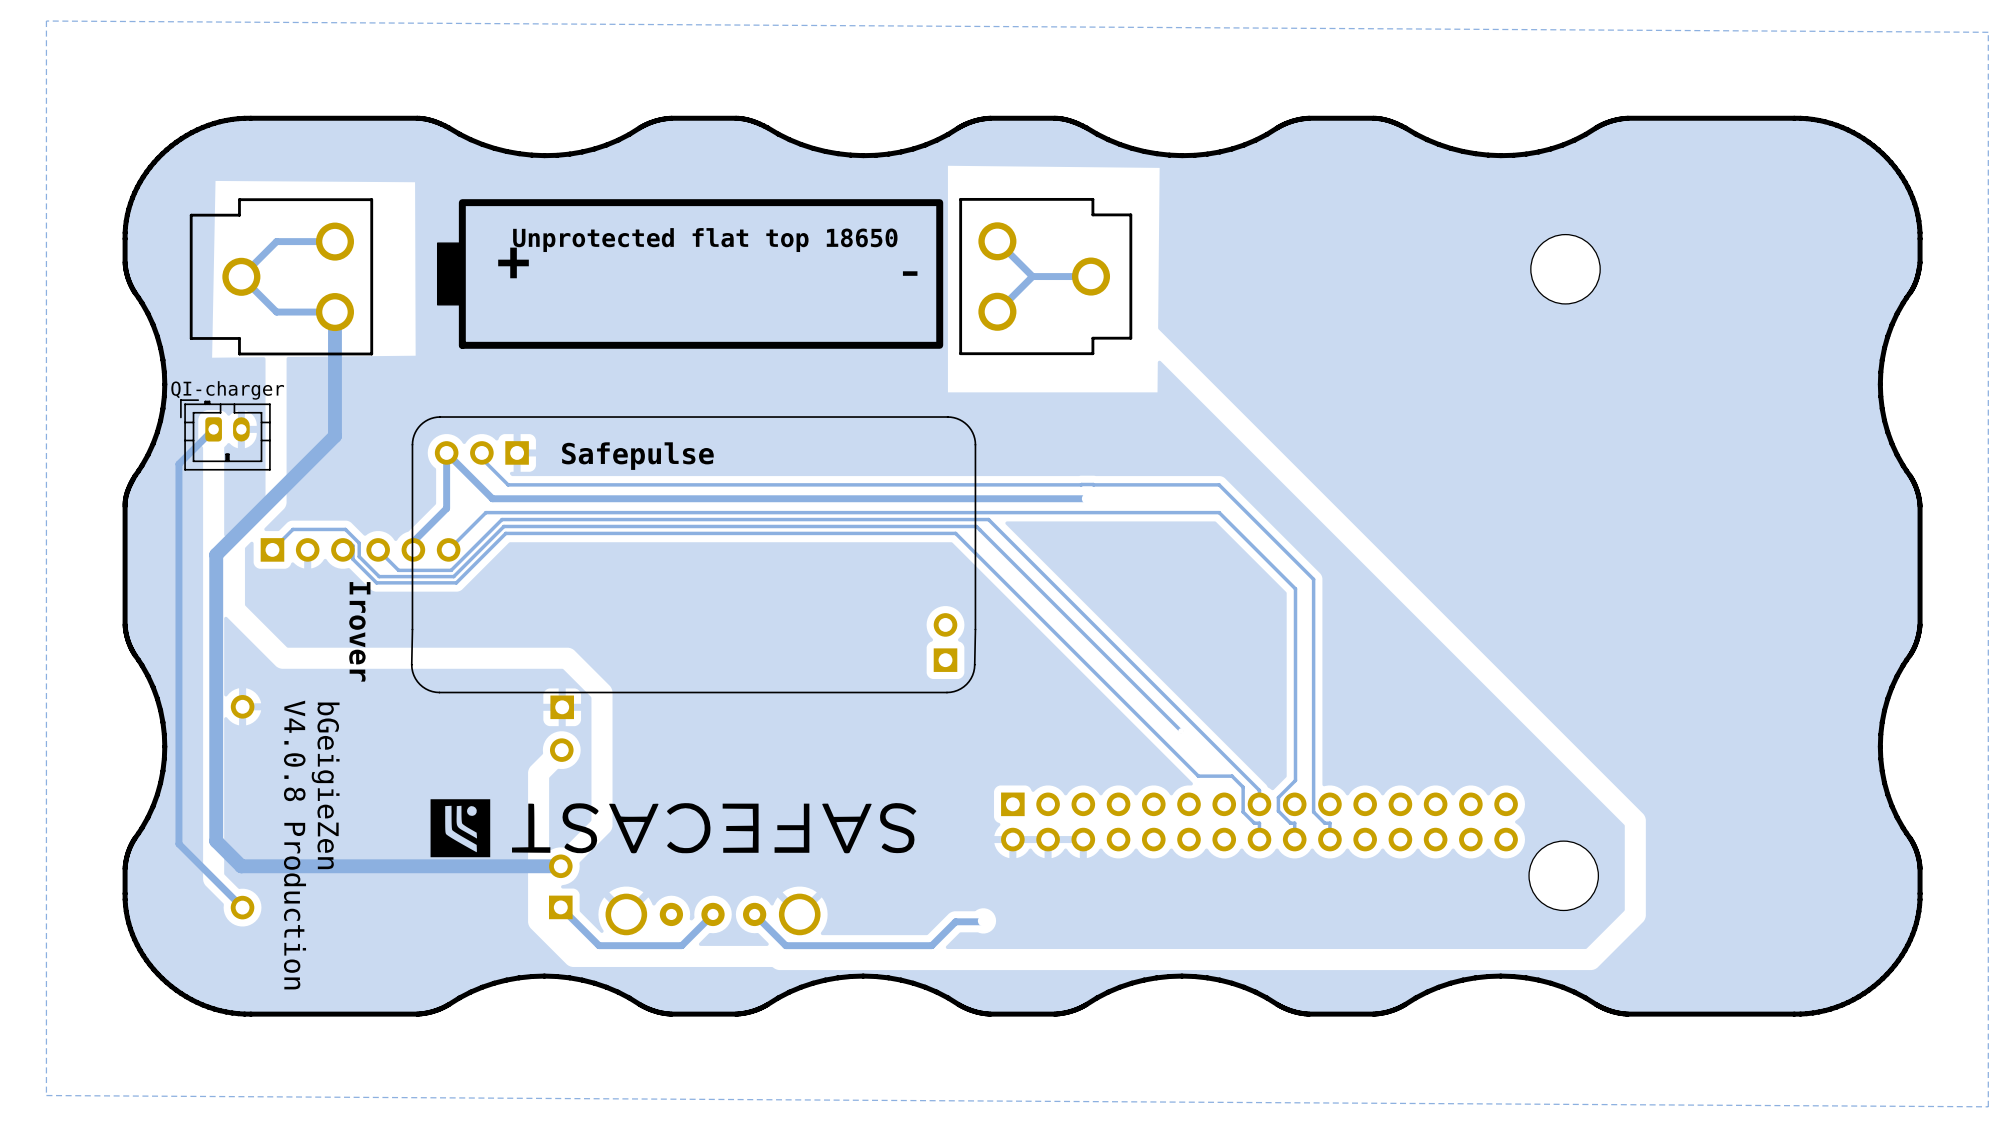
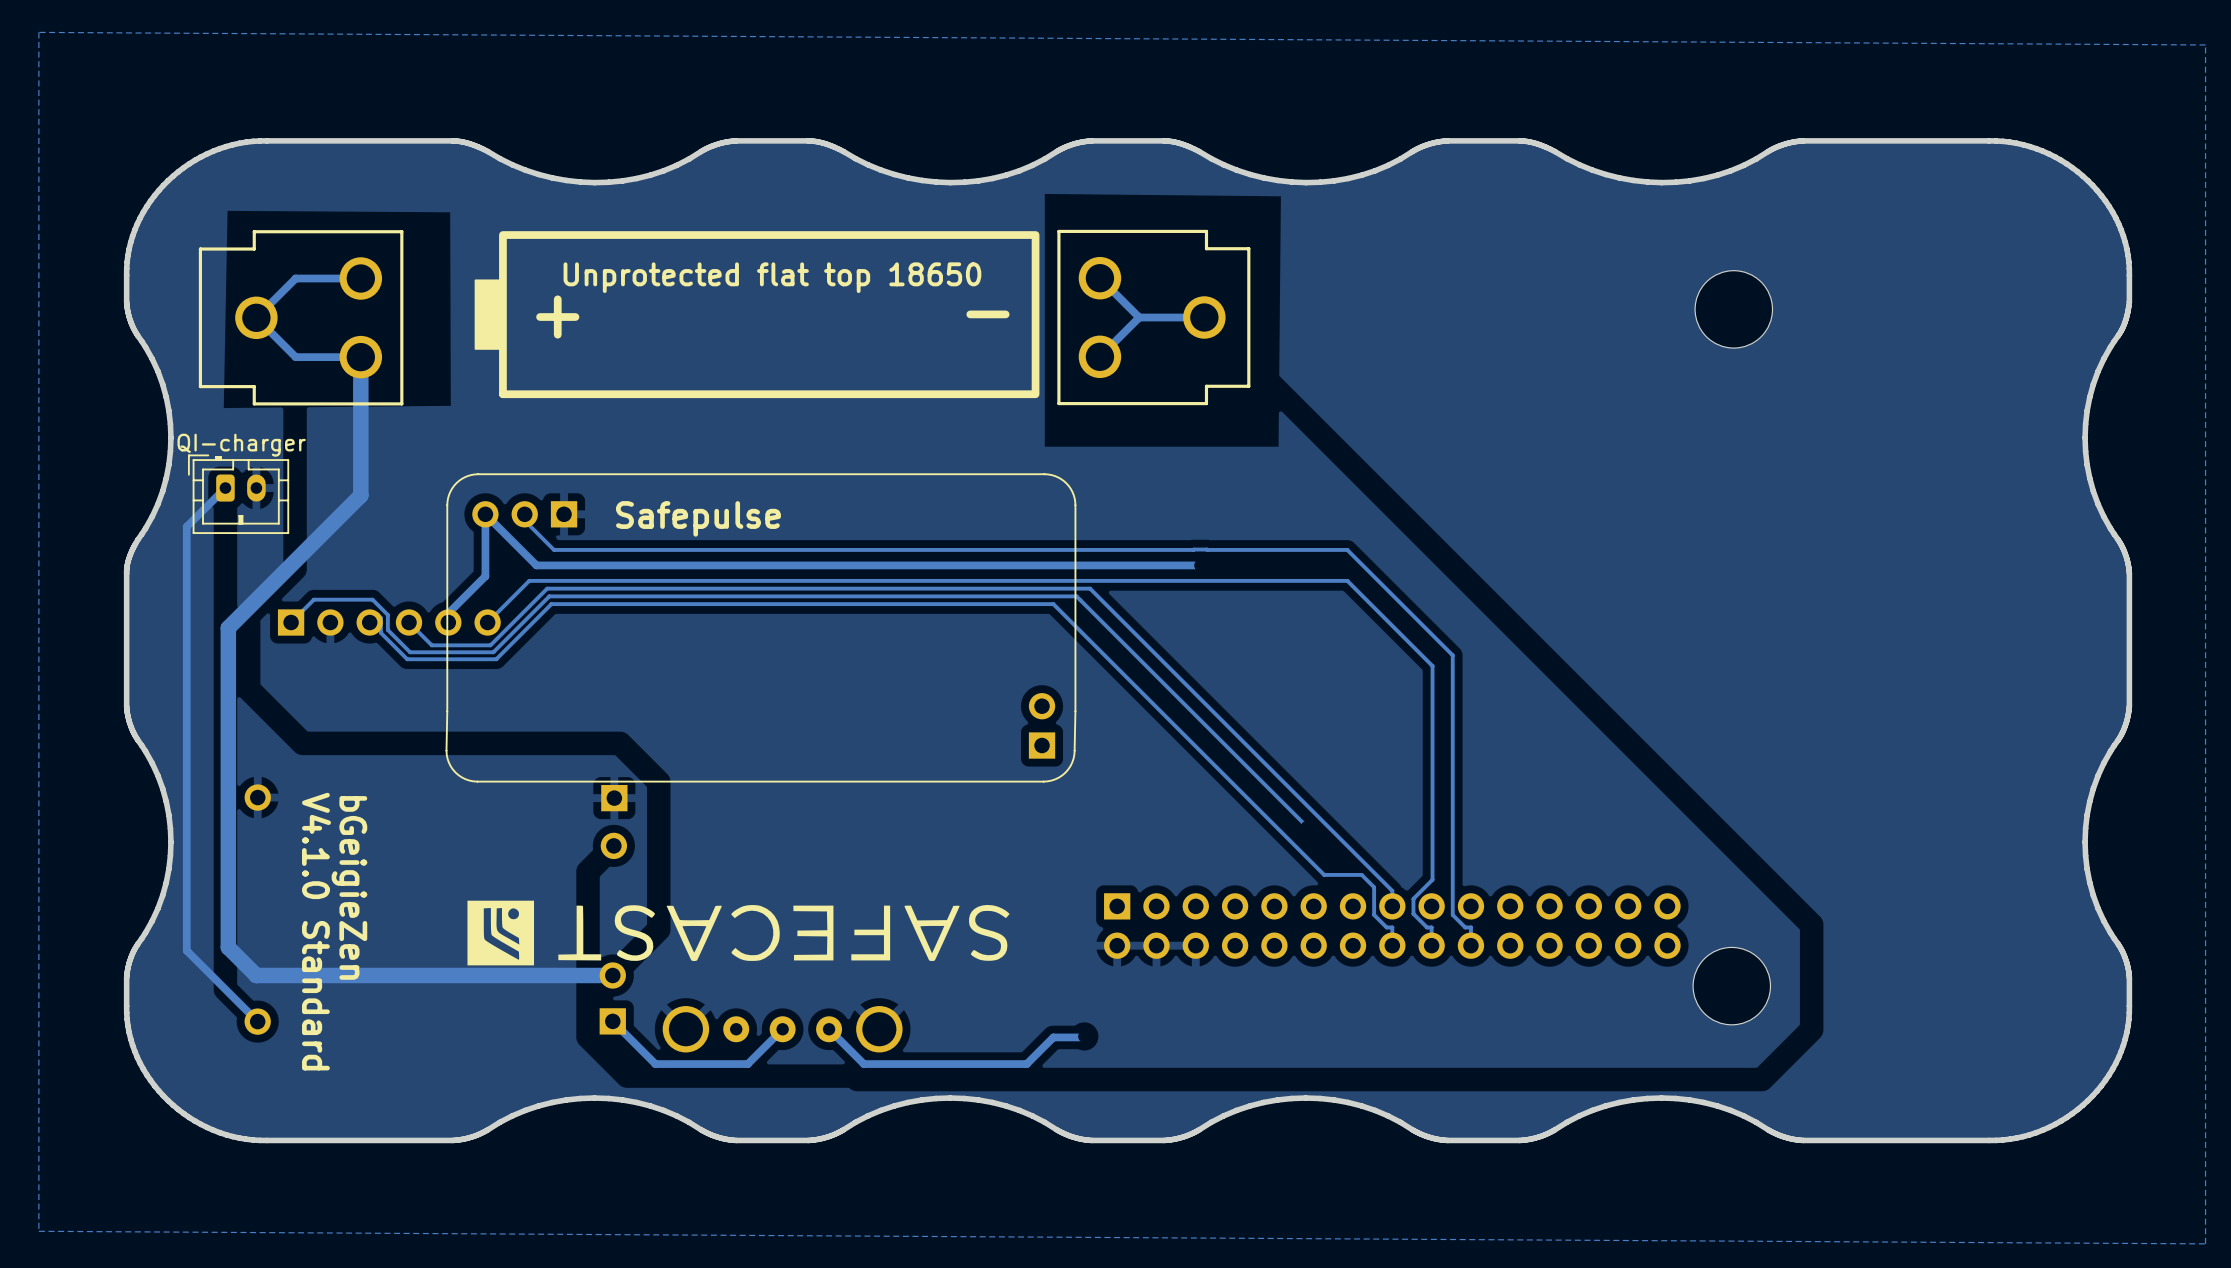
text: Irover (359, 631) -> none
text: V4.0.8 Production (294, 845) -> V4.1.0 Standard (316, 931)

